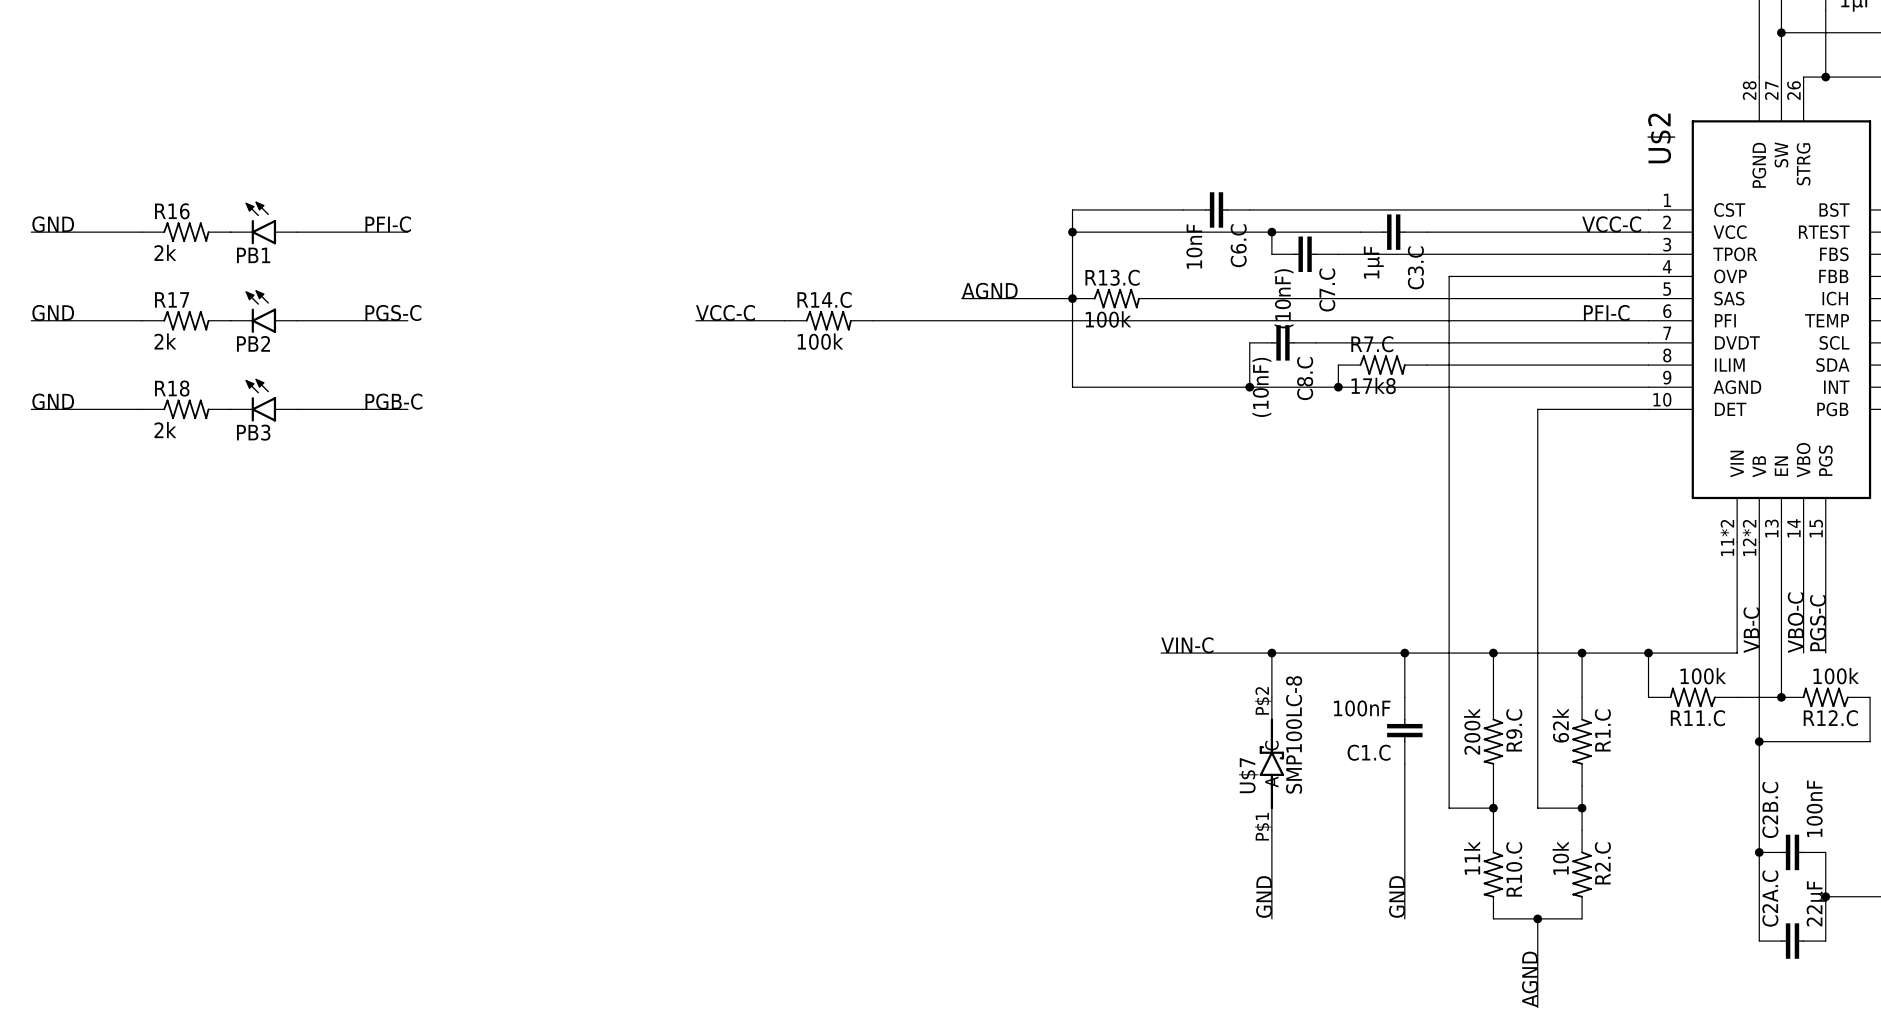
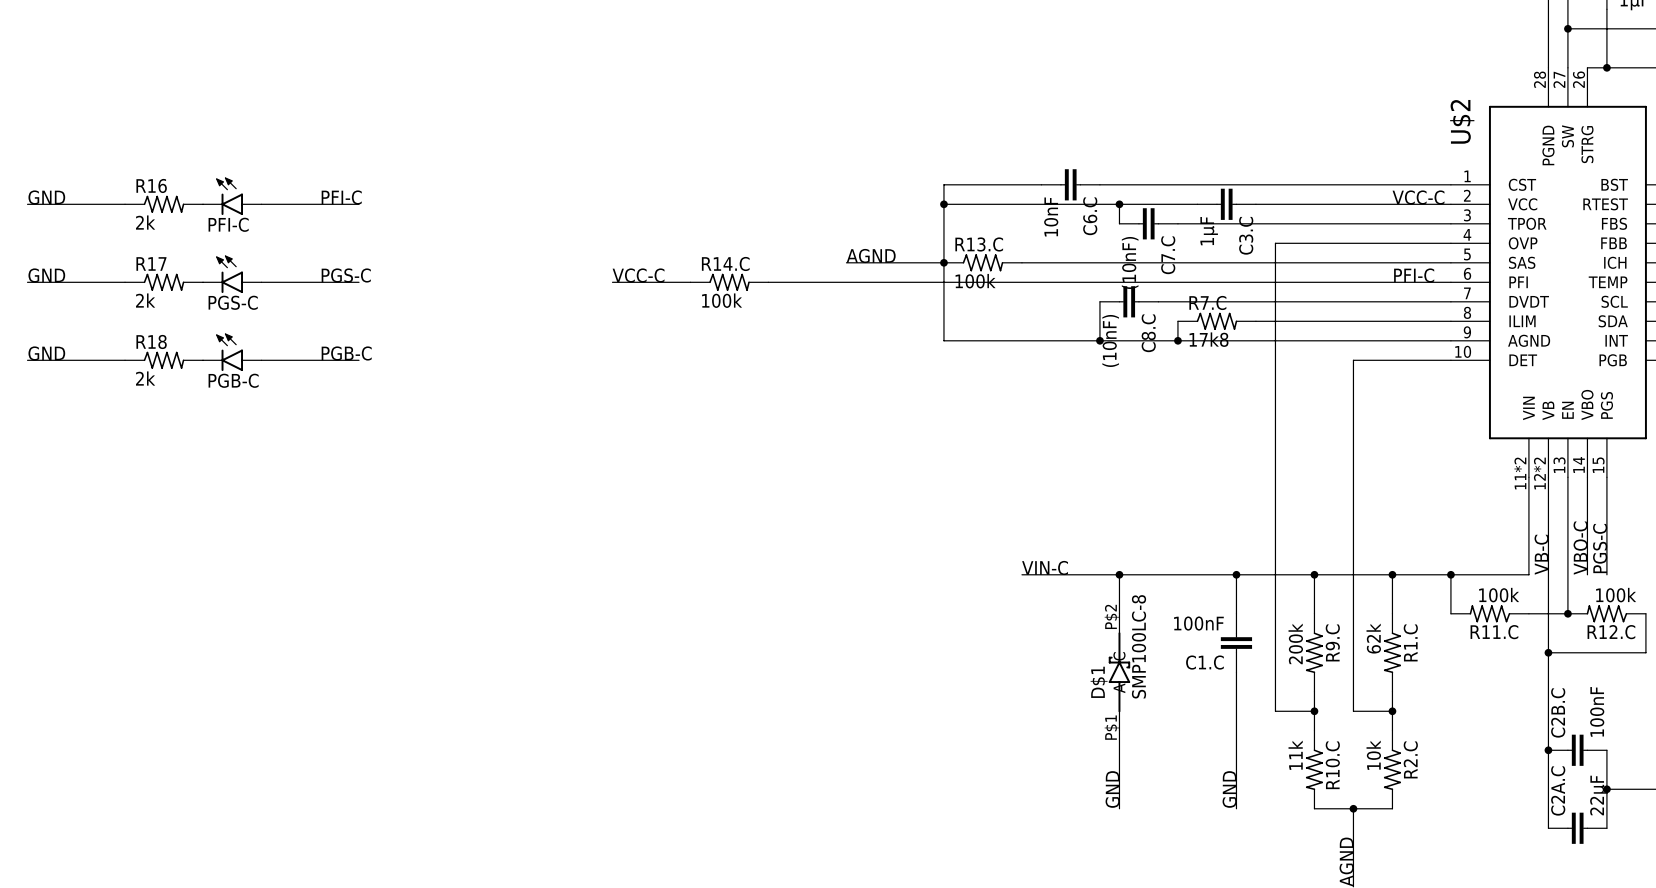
PB1 name: PB1 (253, 255) -> PFI-C (228, 224)
PB2 name: PB2 (253, 343) -> PGS-C (233, 302)
PB3 name: PB3 (253, 432) -> PGB-C (233, 380)
U$7 name: U$7 (1248, 775) -> D$1 (1099, 682)

